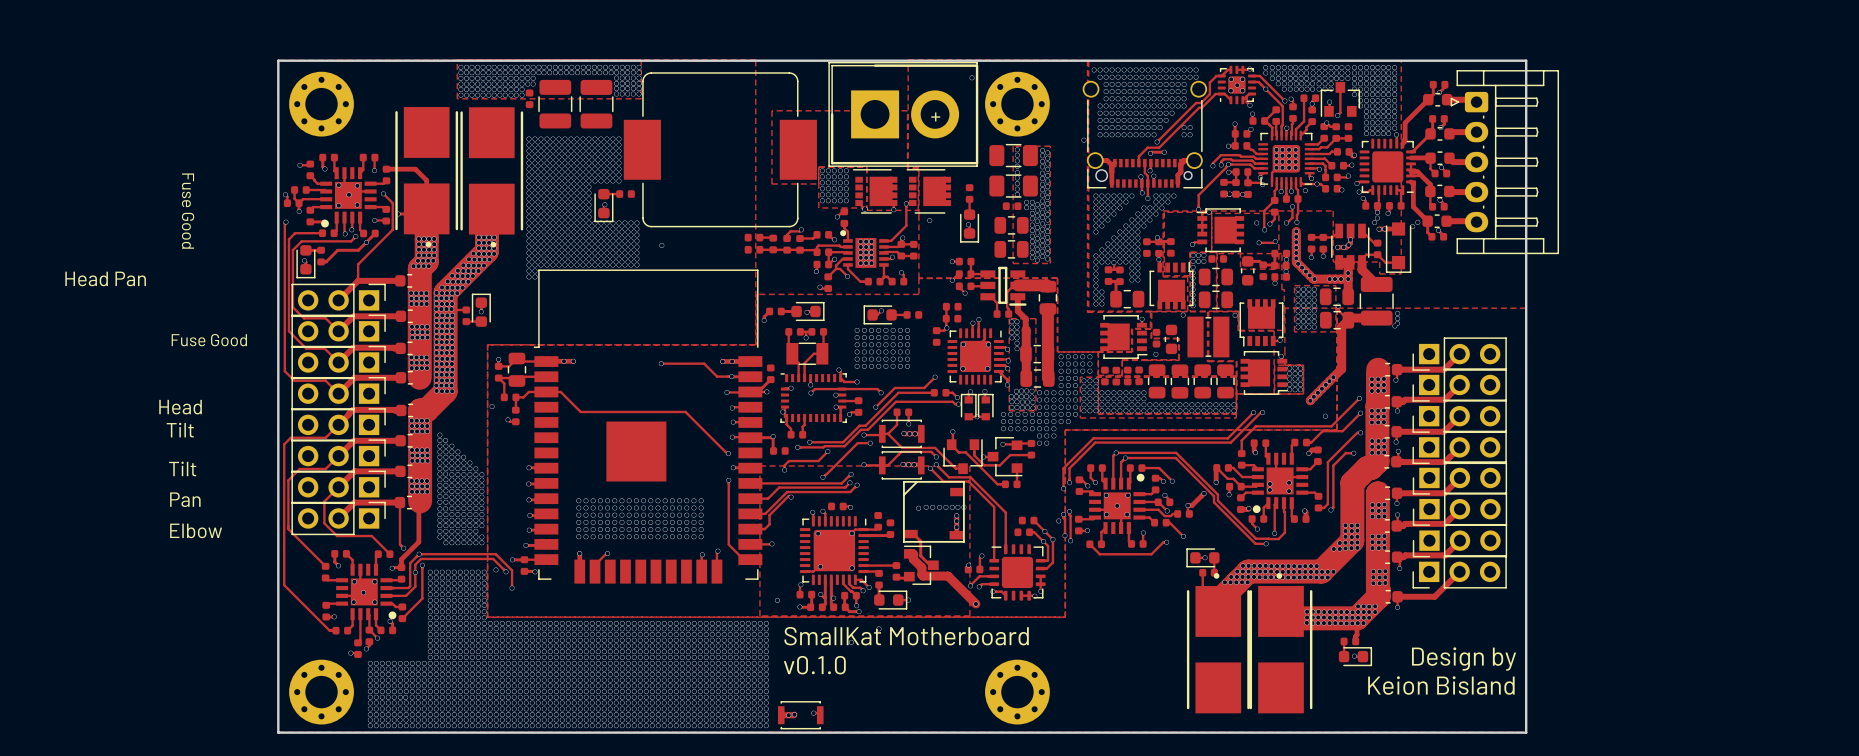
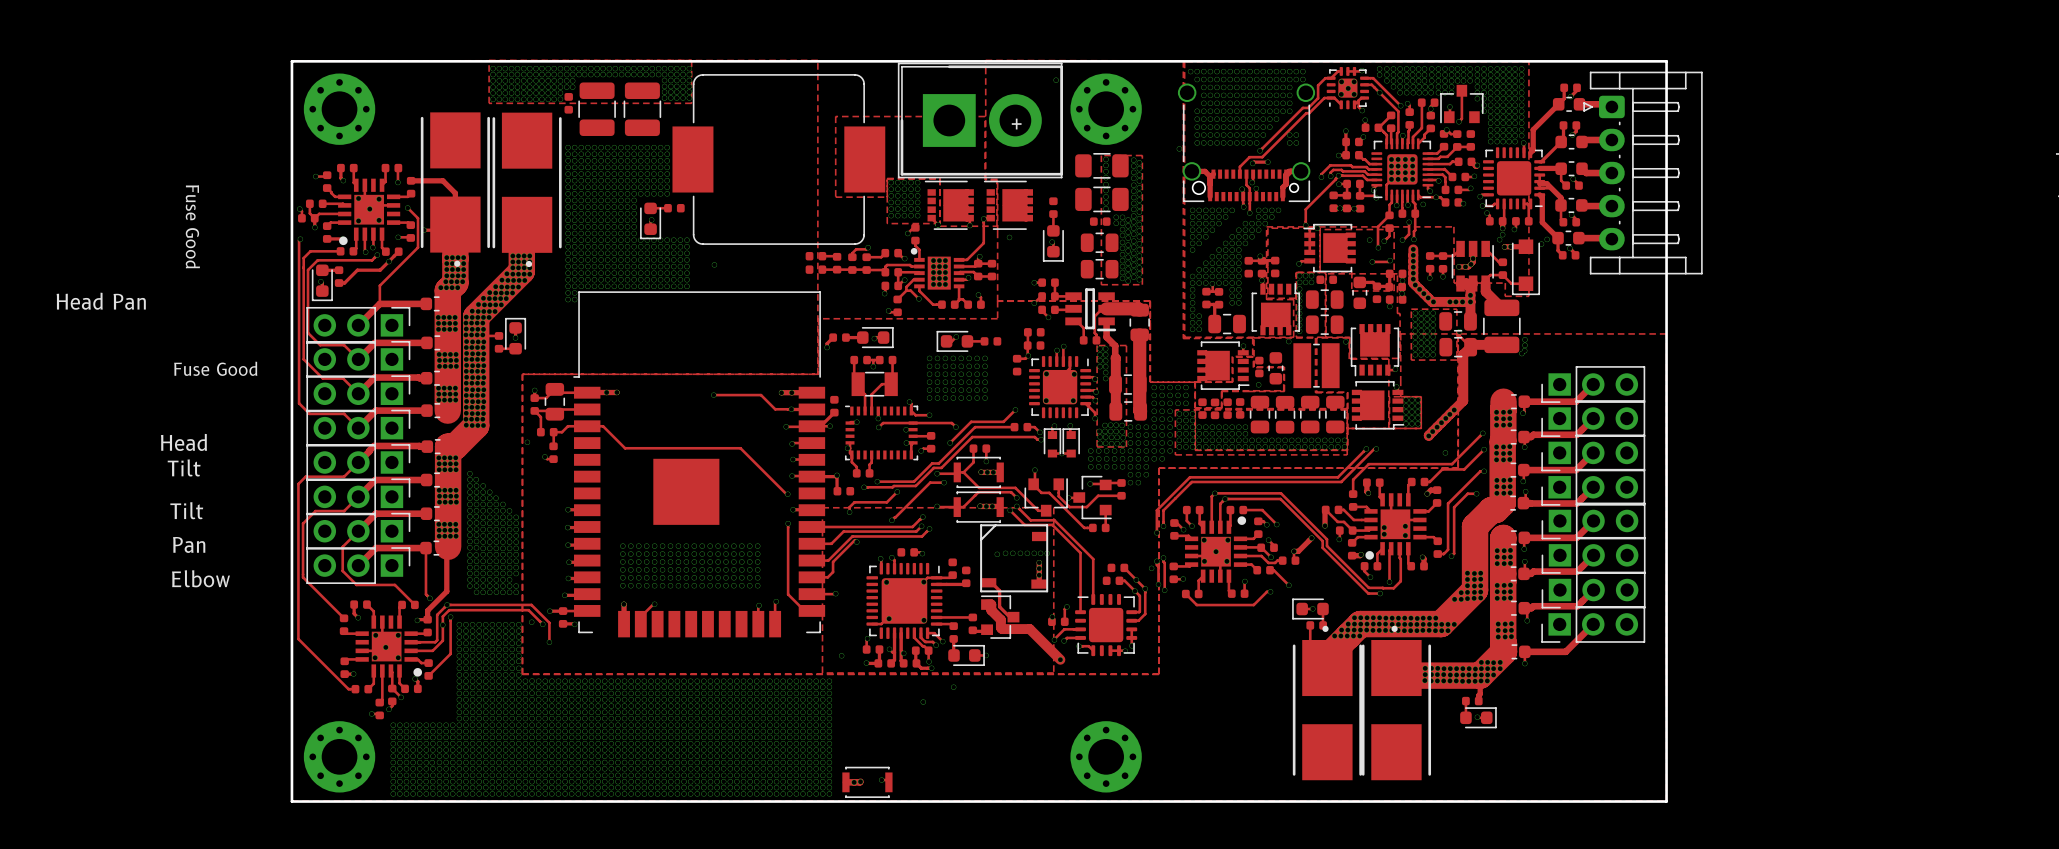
text: SmallKat Motherboard (906, 636) -> none
text: Design by (1464, 659) -> none
text: v0.1.0 (814, 665) -> none
text: Keion Bisland (1441, 685) -> none

